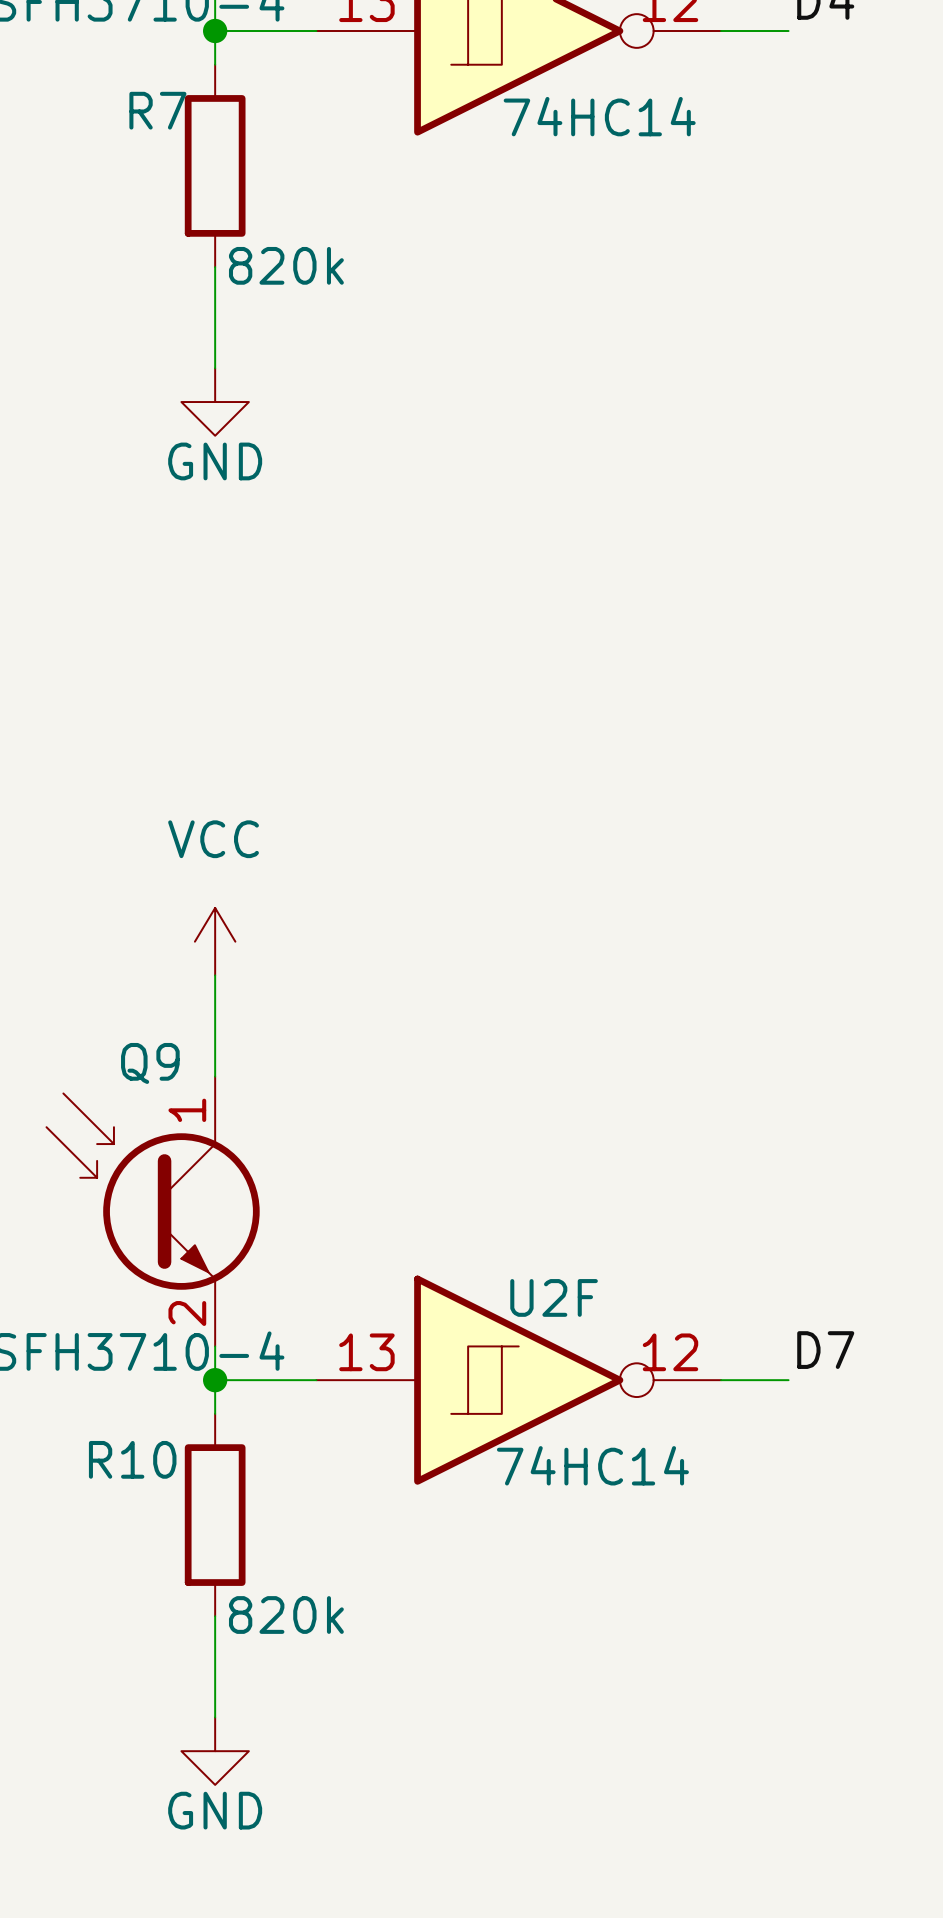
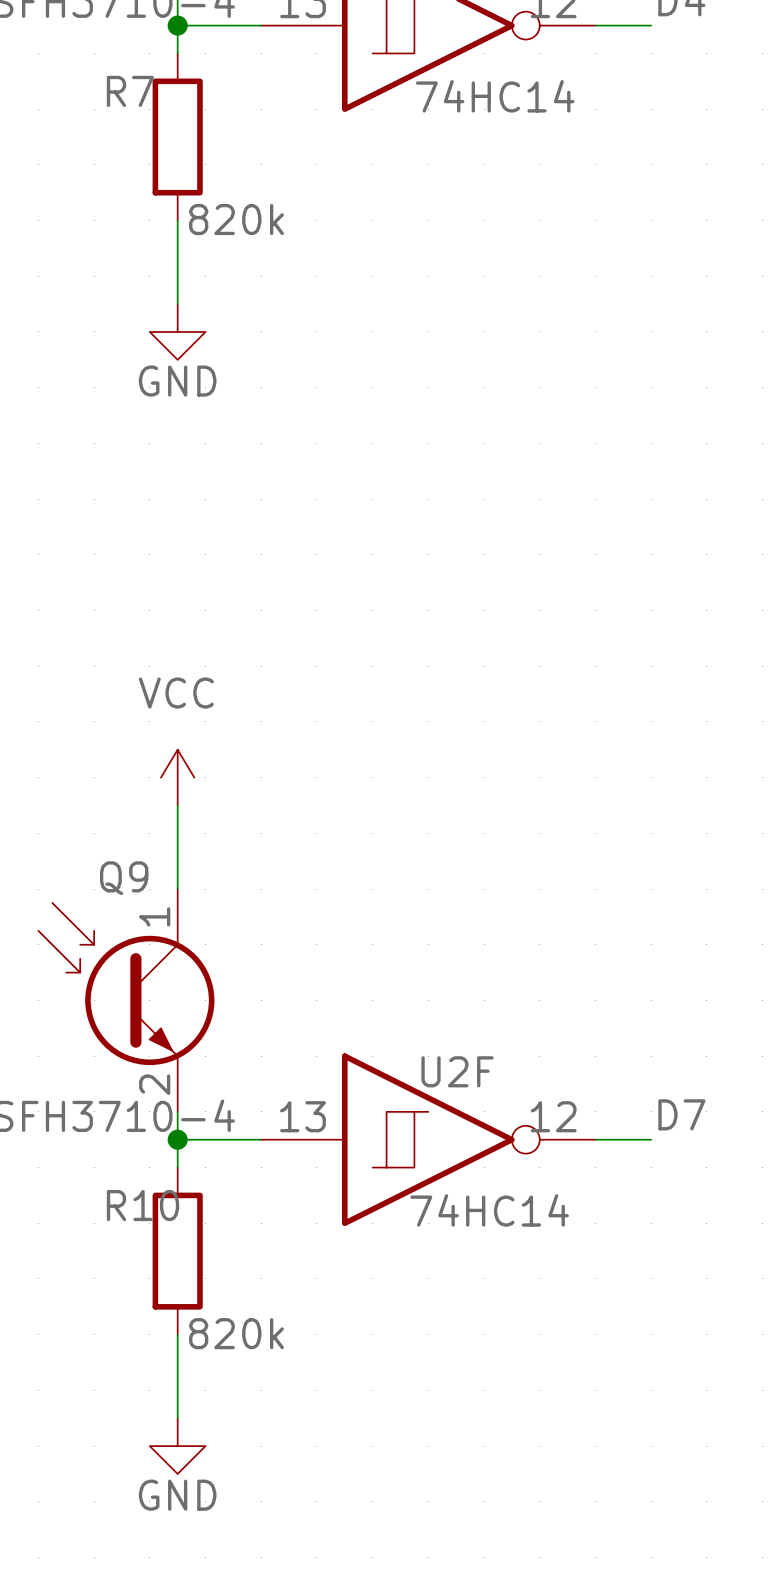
R10 name position: R10 (132, 1459) -> R10 (143, 1205)

